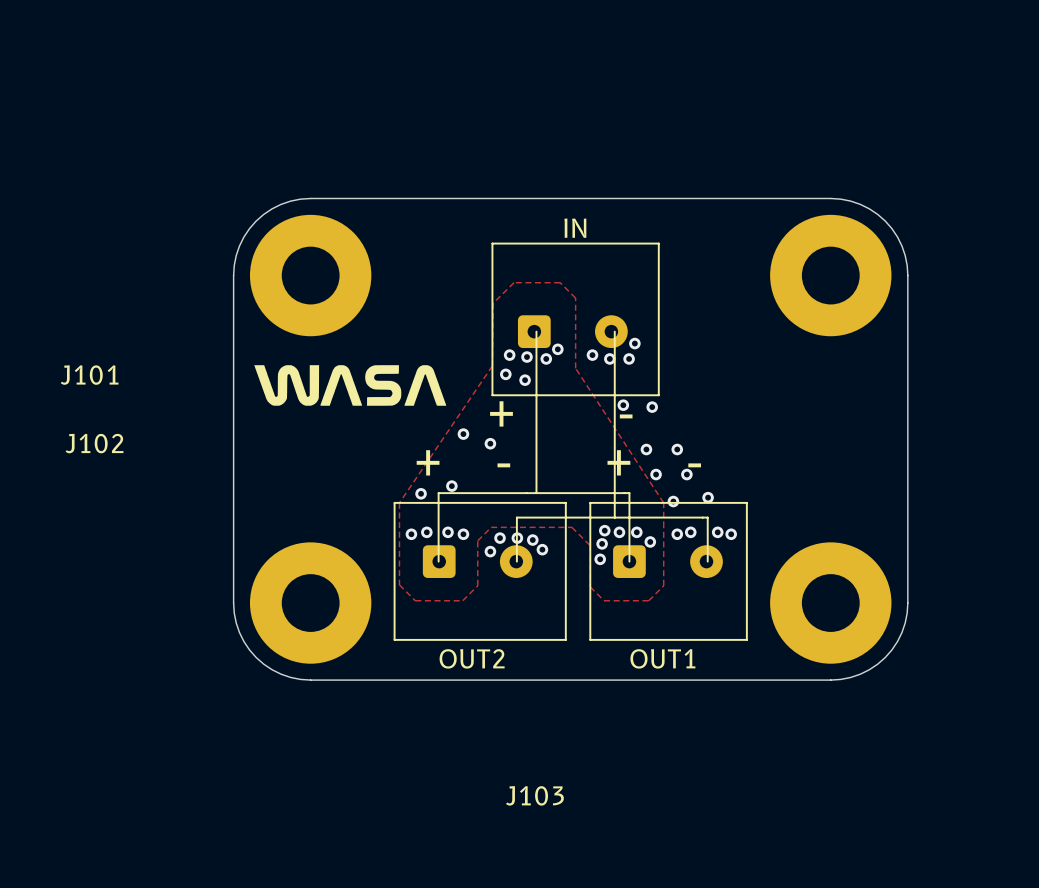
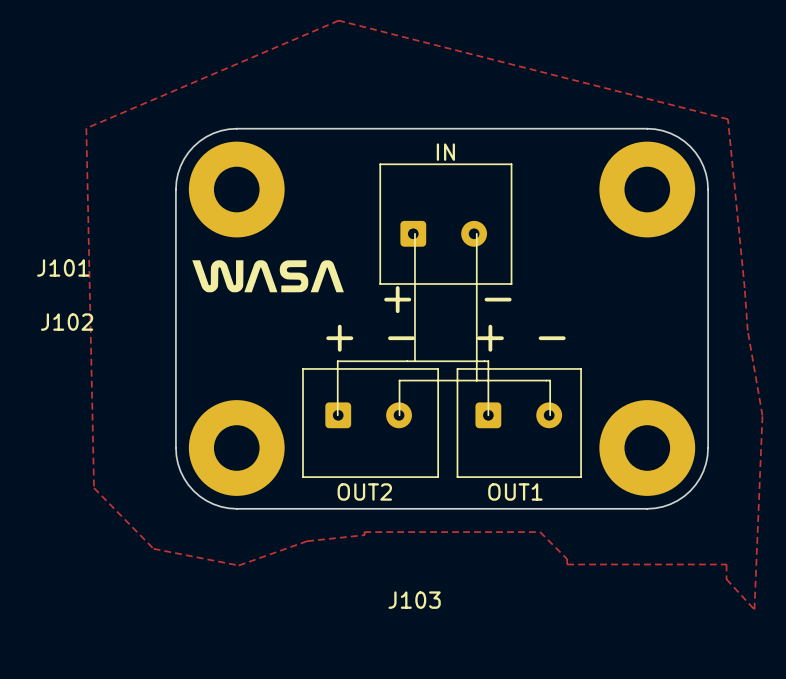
zone outline: none -> (338, 20) (727, 119) (747, 330) (762, 415) (754, 609) (726, 579) (726, 564) (567, 564) (567, 559) (540, 532) (364, 532) (364, 535) (307, 541) (238, 565) (153, 548) (94, 488) (86, 128) (338, 20)
zone outline: (513, 282) (560, 282) (575, 298) (575, 368) (663, 502) (663, 585) (648, 600) (604, 600) (590, 587) (590, 545) (571, 527) (491, 527) (477, 540) (477, 585) (462, 600) (415, 600) (399, 584) (399, 502) (492, 365) (493, 303) (513, 282) -> none
via: (634, 343) -> none
via: (557, 349) -> none
via: (509, 355) -> none
via: (592, 355) -> none
via: (527, 357) -> none
via: (546, 358) -> none
via: (609, 358) -> none
via: (629, 358) -> none
via: (505, 374) -> none
via: (525, 380) -> none
via: (623, 405) -> none
via: (652, 407) -> none
via: (463, 434) -> none
via: (490, 443) -> none
via: (646, 449) -> none
via: (677, 449) -> none
via: (656, 474) -> none
via: (686, 474) -> none
via: (451, 486) -> none
via: (421, 493) -> none
via: (708, 497) -> none
via: (673, 501) -> none
via: (604, 530) -> none
via: (426, 532) -> none
via: (448, 532) -> none
via: (619, 532) -> none
via: (636, 532) -> none
via: (690, 532) -> none
via: (717, 532) -> none
via: (411, 534) -> none
via: (463, 534) -> none
via: (677, 534) -> none
via: (731, 534) -> none
via: (500, 538) -> none
via: (517, 538) -> none
via: (532, 540) -> none
via: (650, 541) -> none
via: (602, 543) -> none
via: (542, 549) -> none
via: (490, 551) -> none
via: (600, 559) -> none

